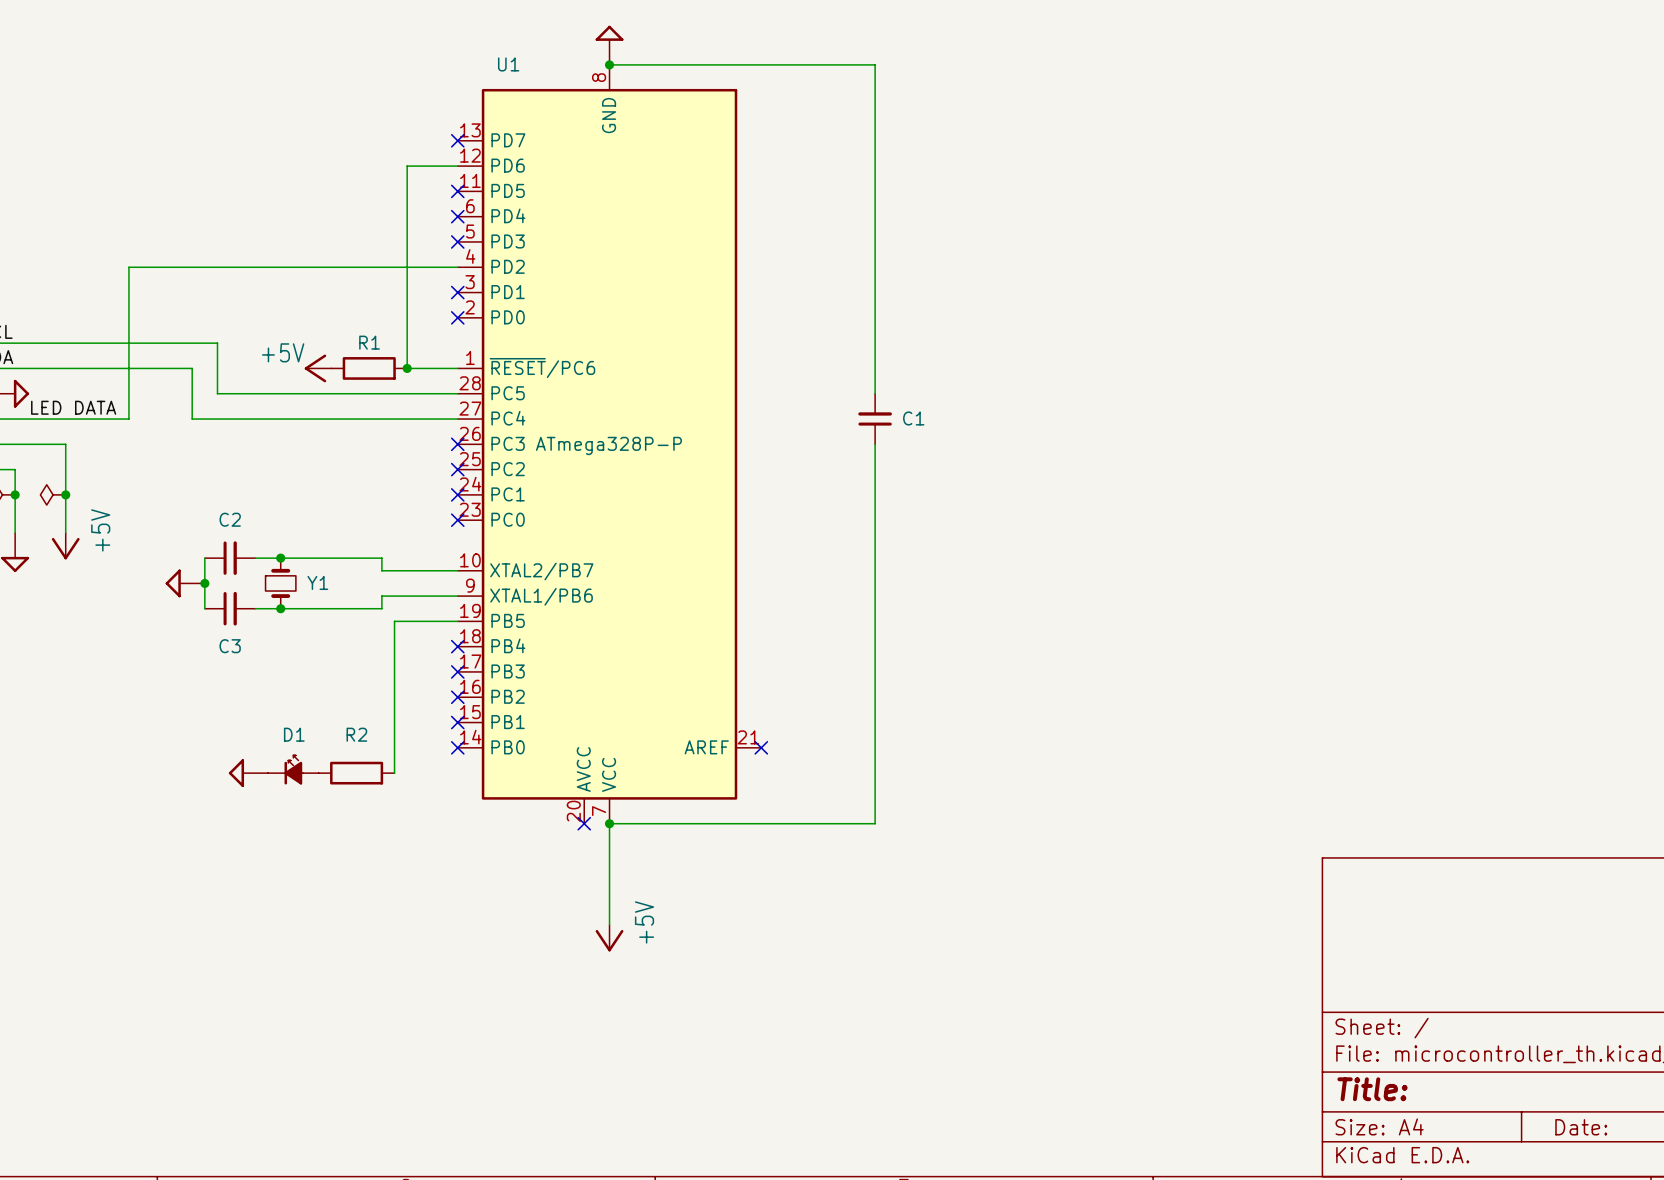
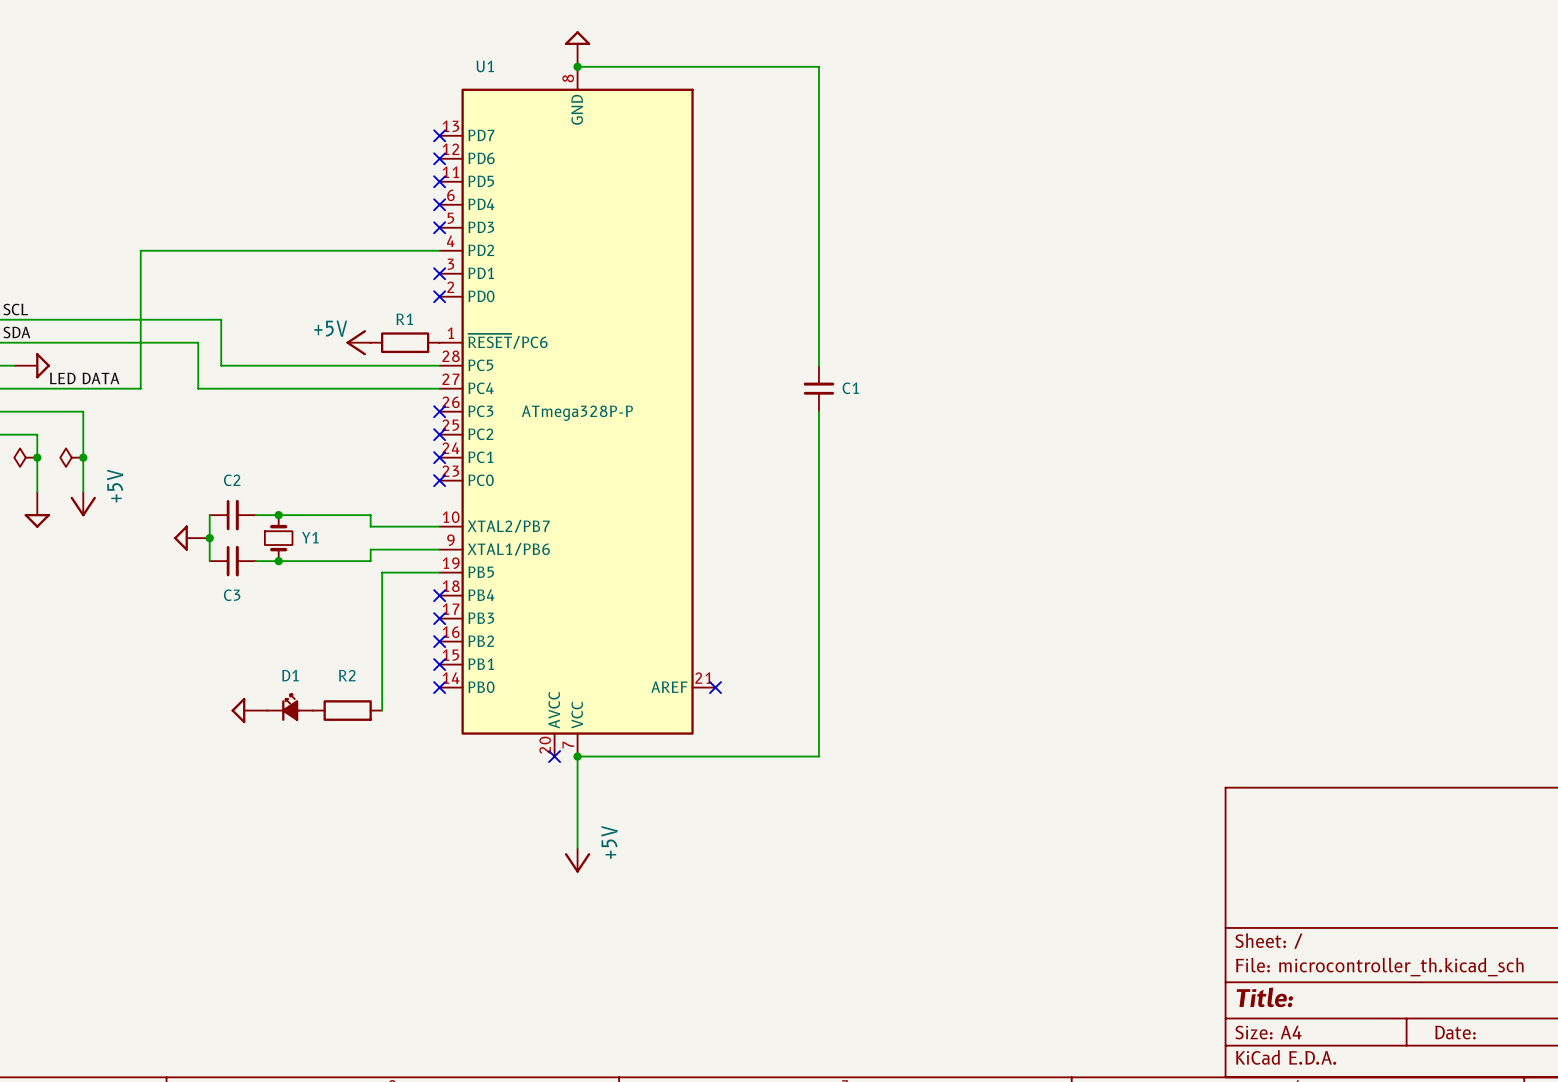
wire: (457, 166) (407, 166) (407, 368) (457, 368) -> none
no-connect mark: none -> (439, 158)
power symbol position: +5V (318, 368) -> +5V (358, 342)
R1 position: (369, 368) -> (405, 342)
junction: (407, 368) -> none

